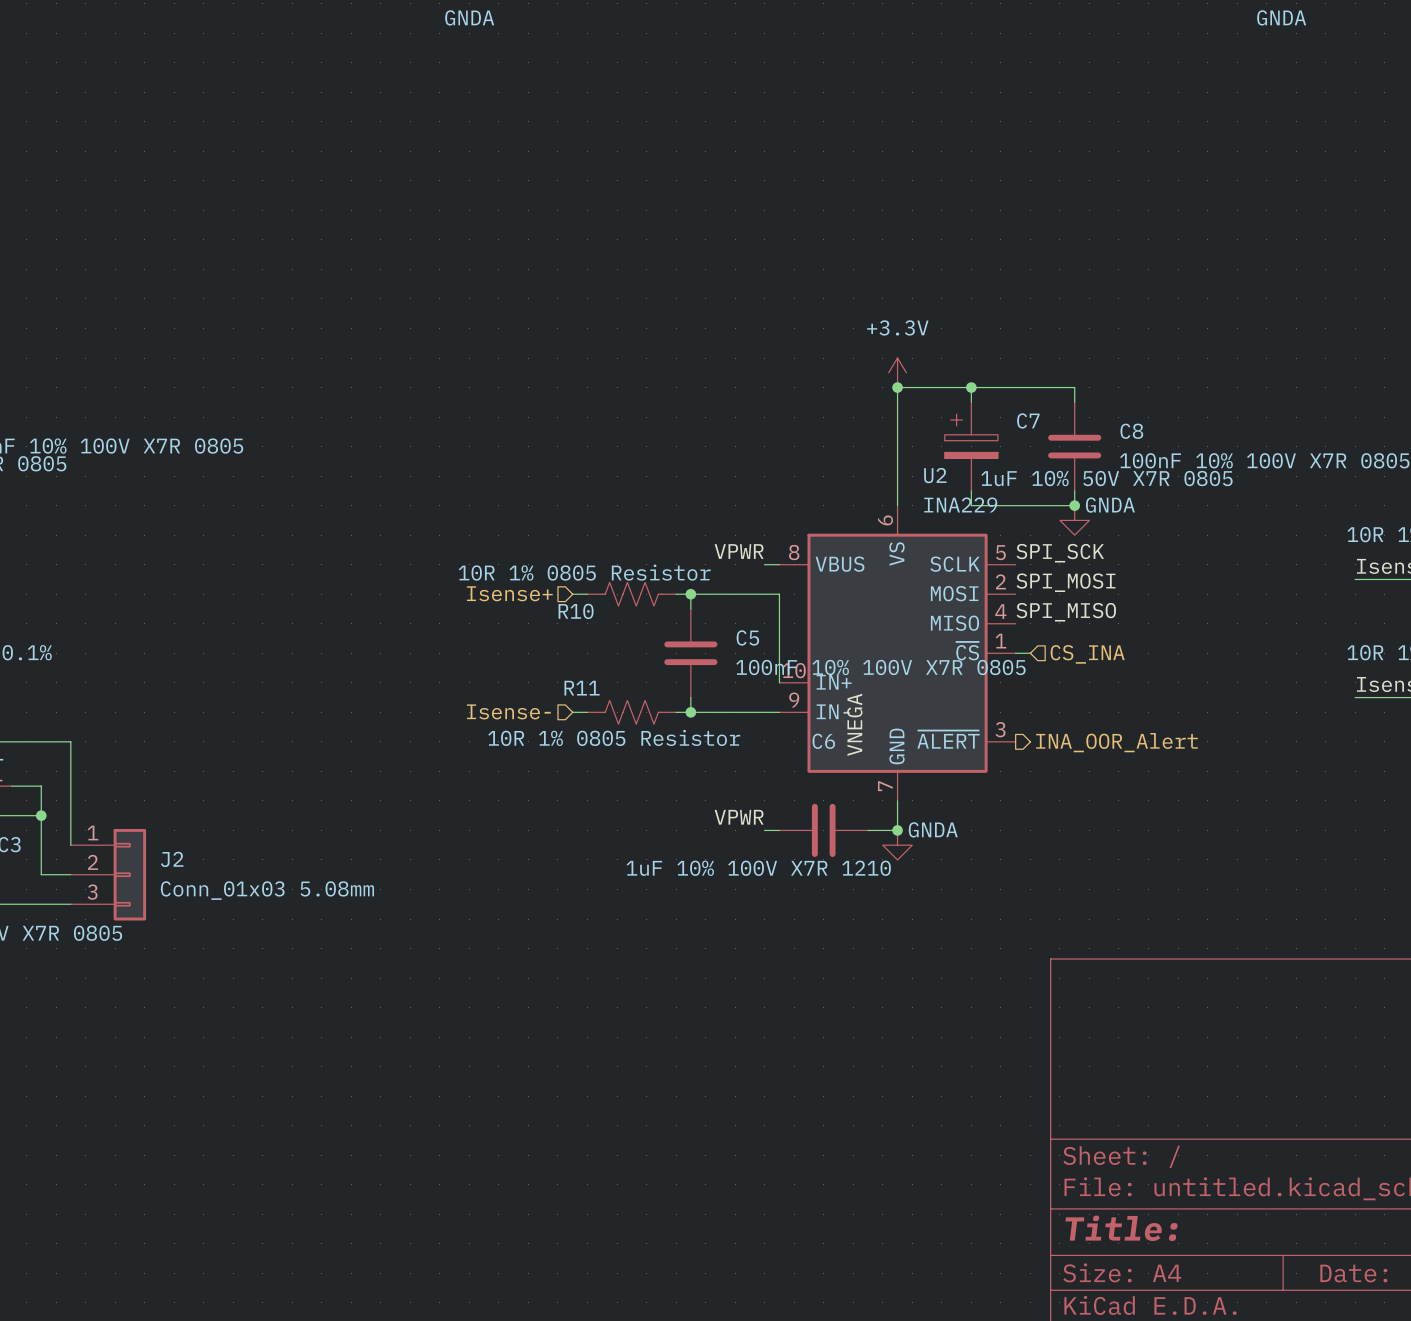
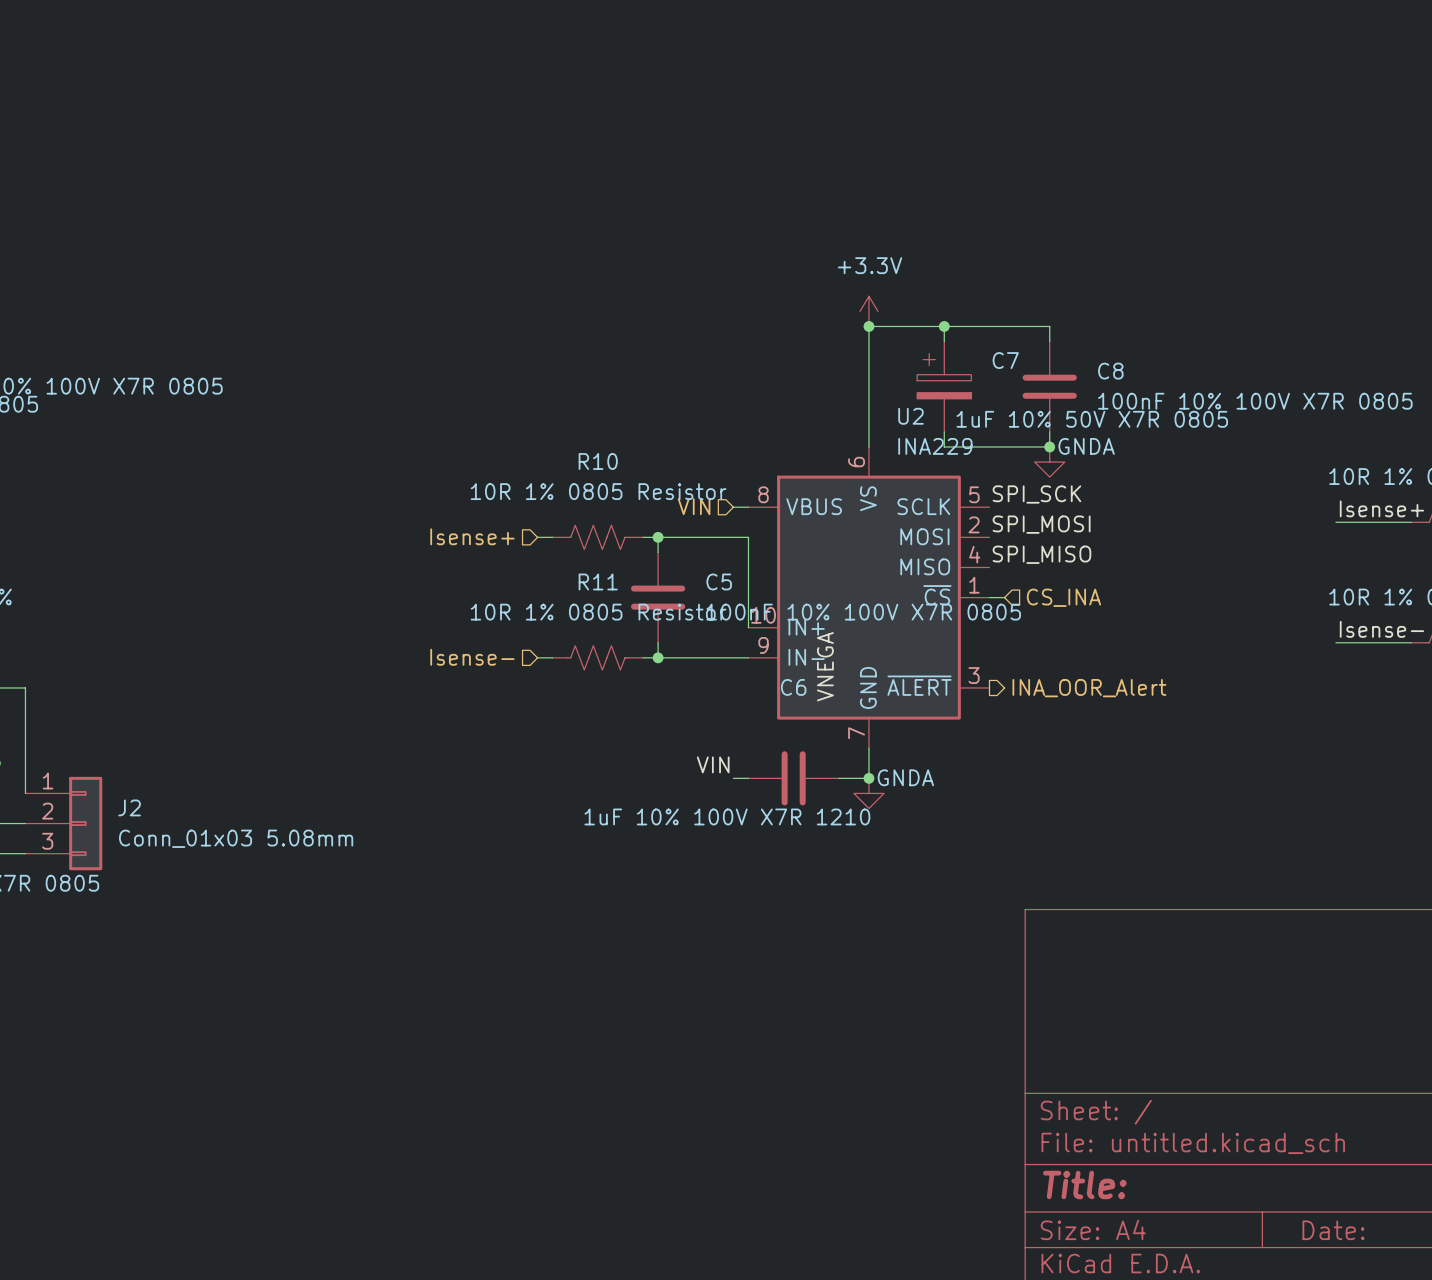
label: VPWR (739, 551) -> none
hierarchical label: none -> VIN (694, 506)
R10 value position: 10R 1% 0805 Resistor (584, 572) -> 10R 1% 0805 Resistor (598, 491)
R10 name position: R10 (576, 611) -> R10 (598, 461)
R11 name position: R11 (582, 688) -> R11 (598, 581)
R11 value position: 10R 1% 0805 Resistor (614, 737) -> 10R 1% 0805 Resistor (598, 612)
label: VPWR (739, 817) -> VIN (713, 764)

